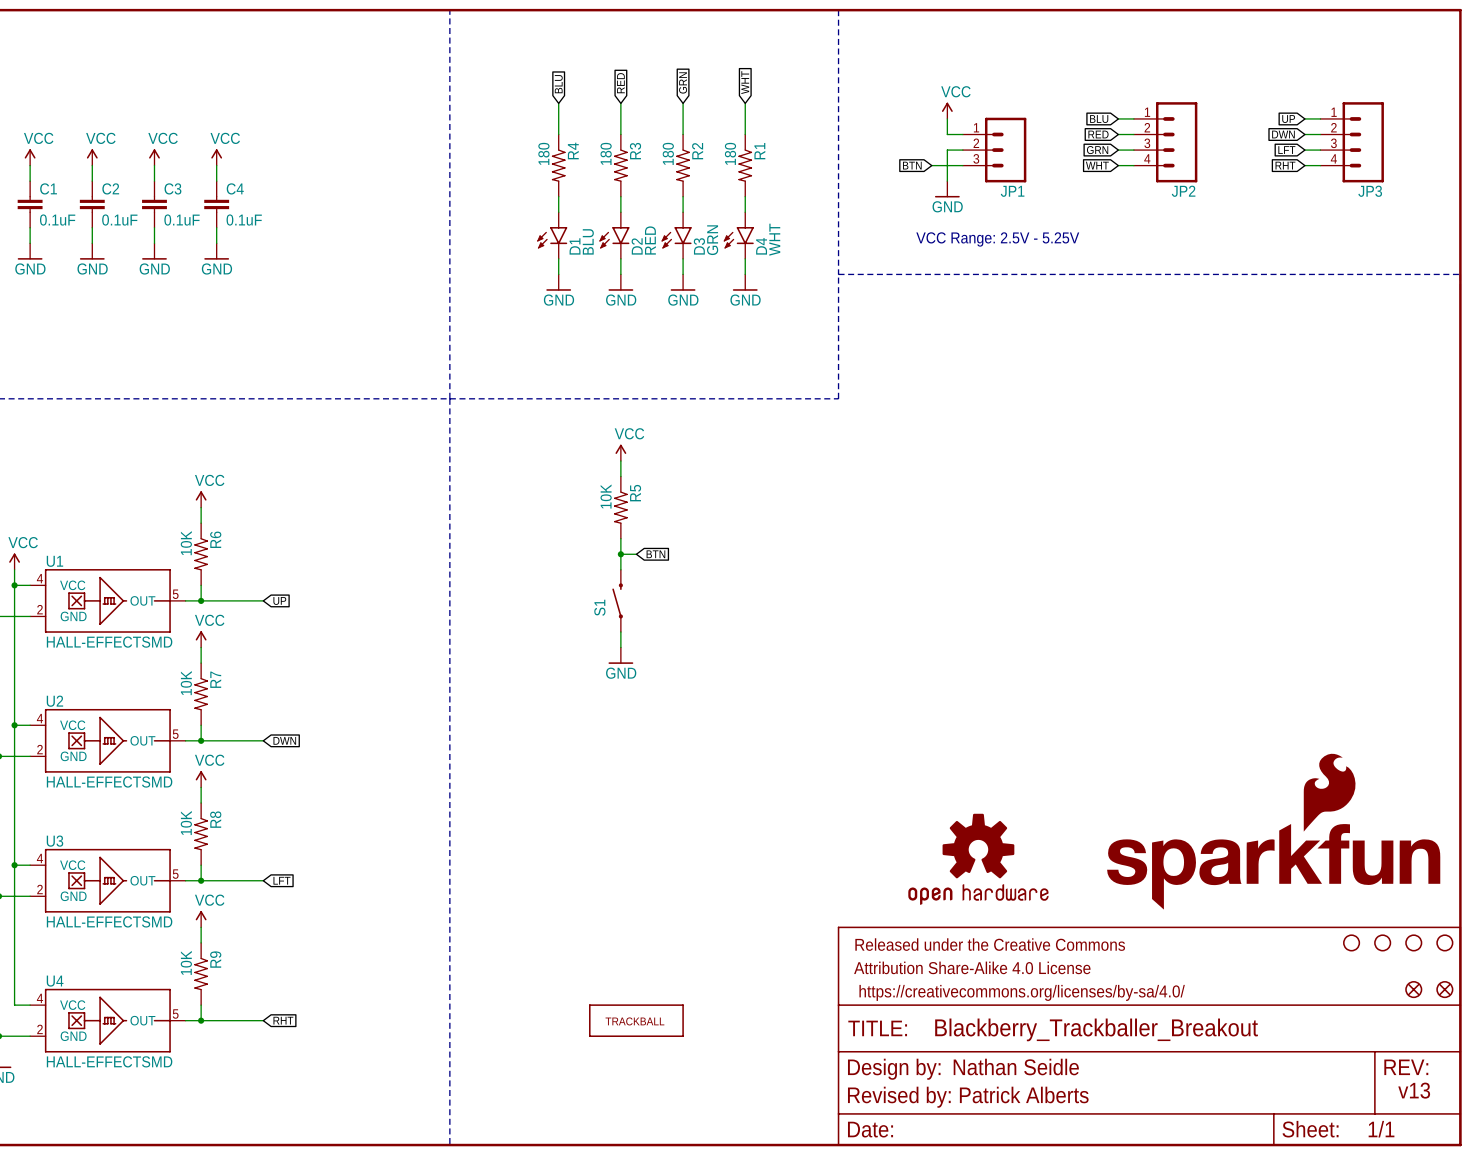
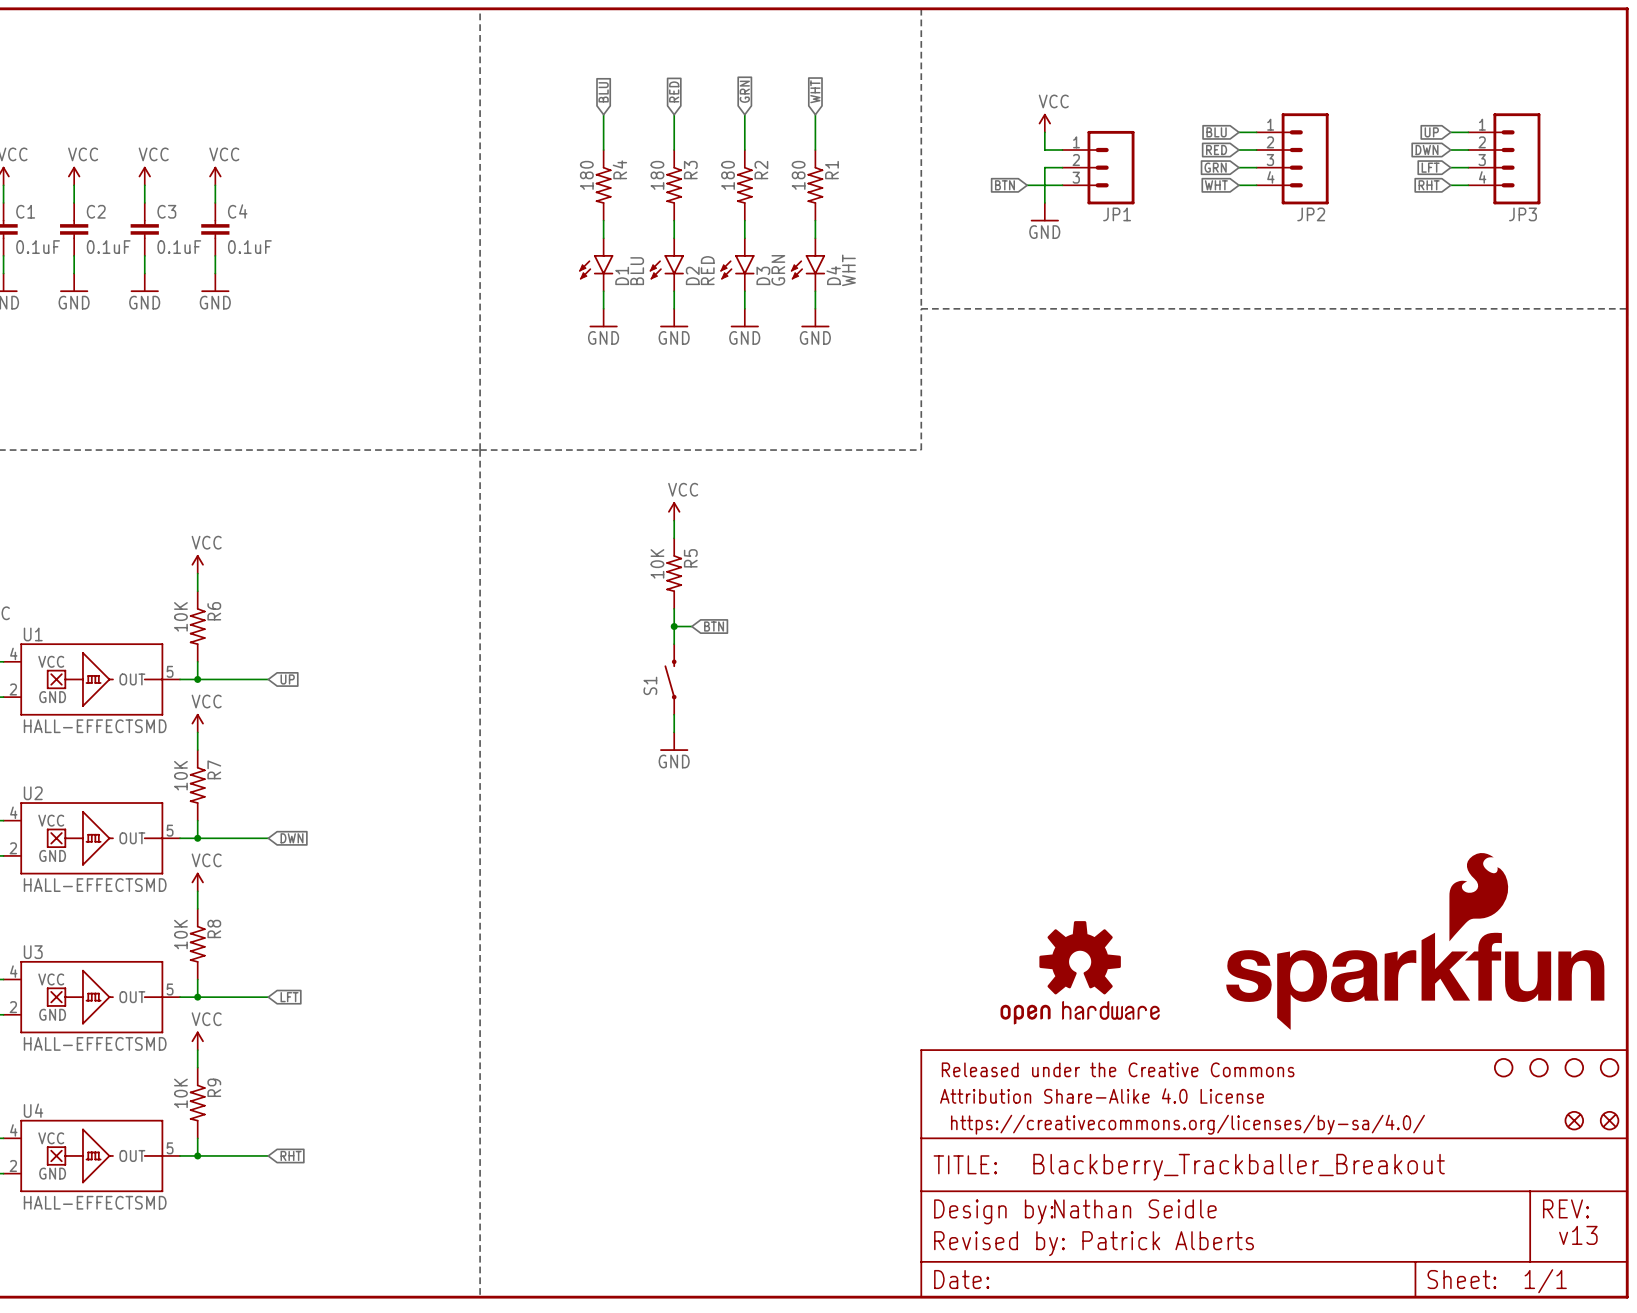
text: VCC Range: 2.5V - 5.25V (997, 239) -> none
part: (636, 1020) -> none

